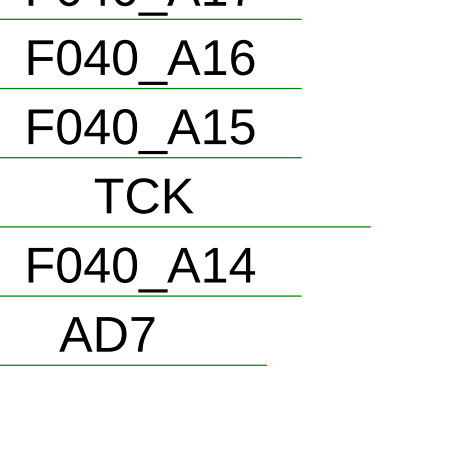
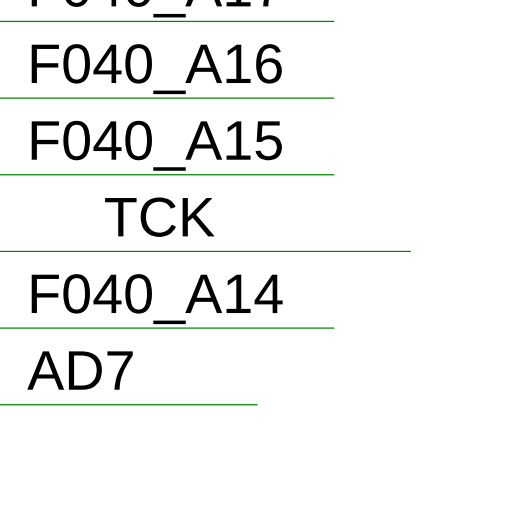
label position: AD7 (106, 334) -> AD7 (80, 370)
wire: (232, 365) (266, 365) -> none

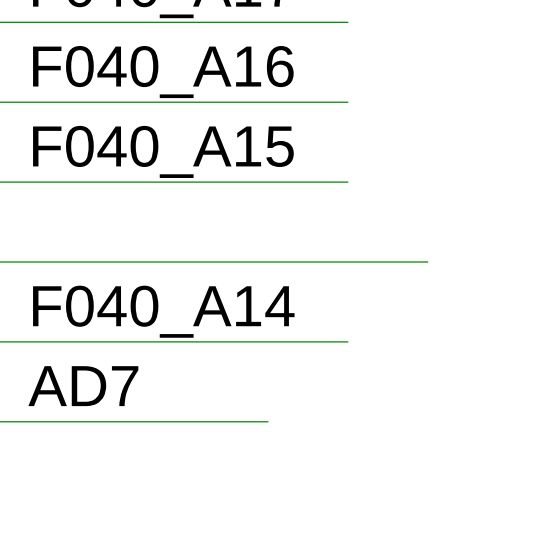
label: TCK (159, 217) -> none

